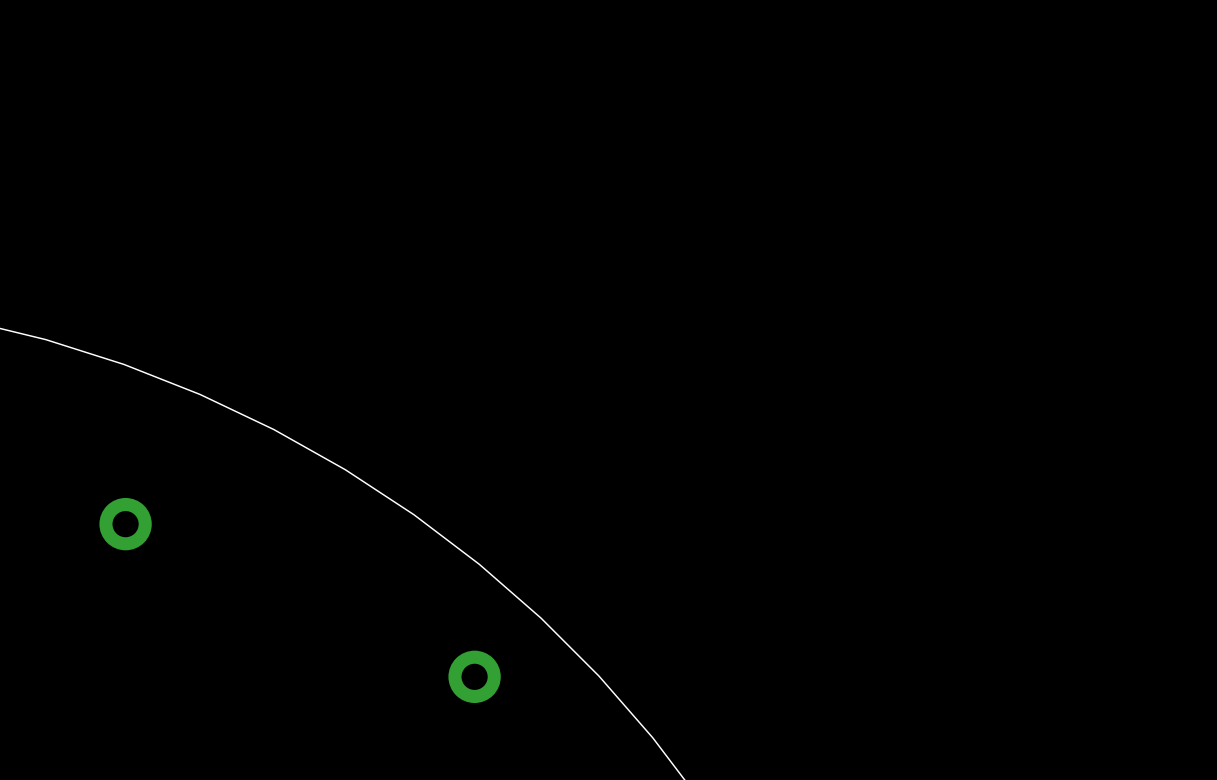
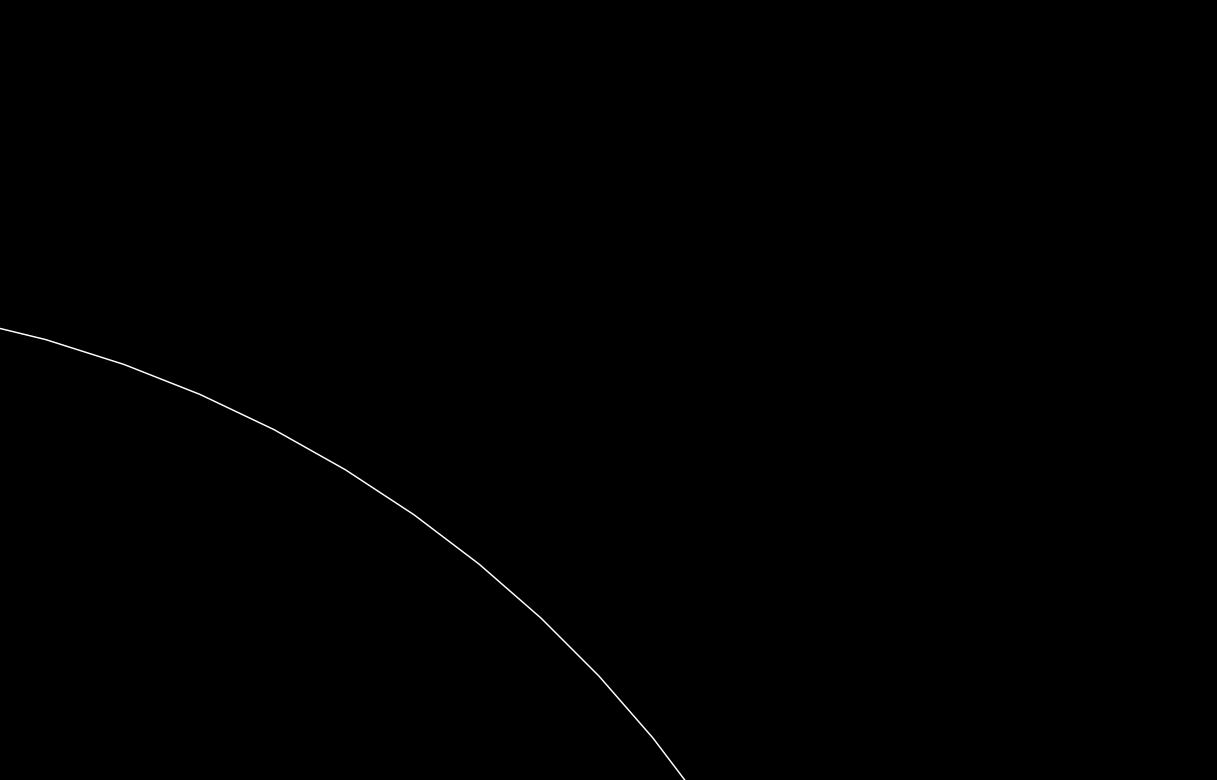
via: (125, 524) -> none
via: (474, 676) -> none

